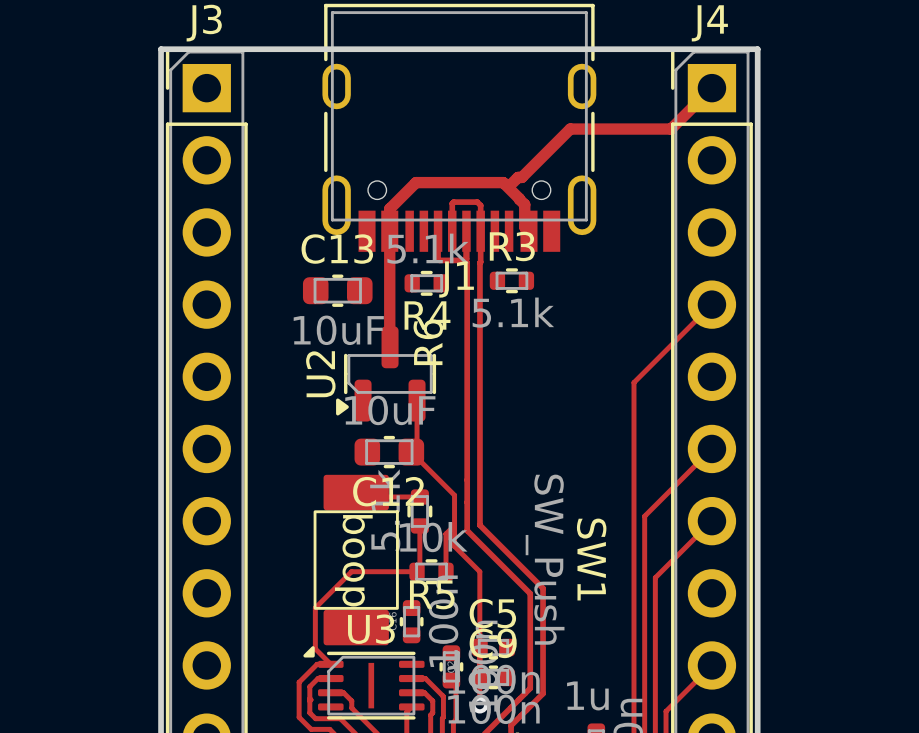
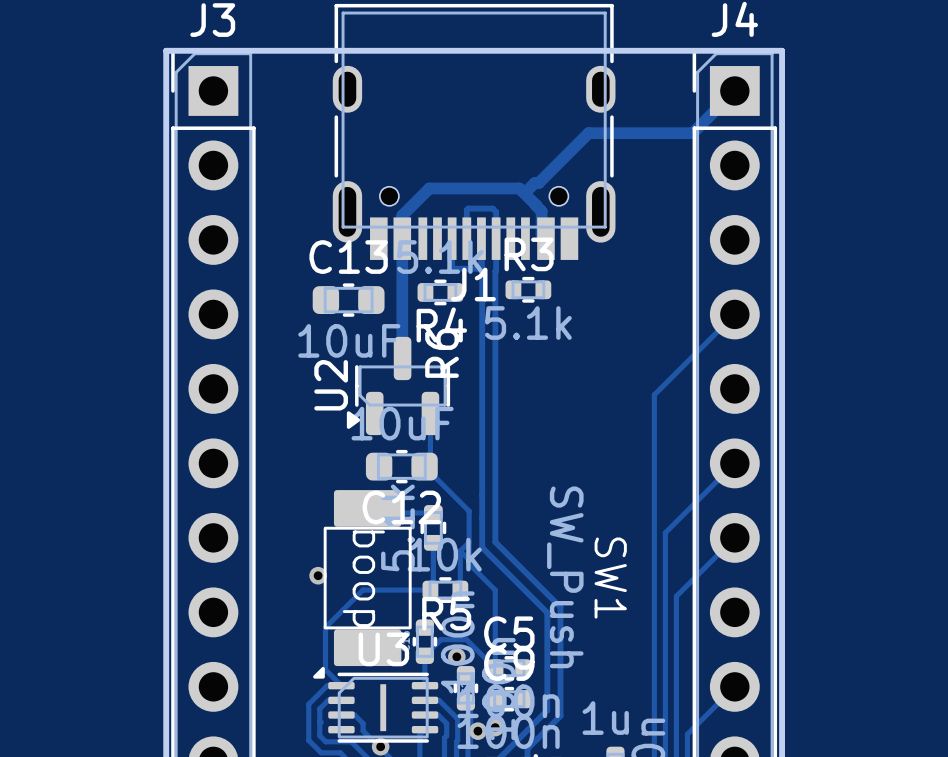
via: none -> (318, 575)
via: none -> (456, 656)
track: none -> (495, 668) (466, 639) (441, 639) (424, 655) (424, 685)
via: none -> (477, 731)
via: none -> (380, 746)

